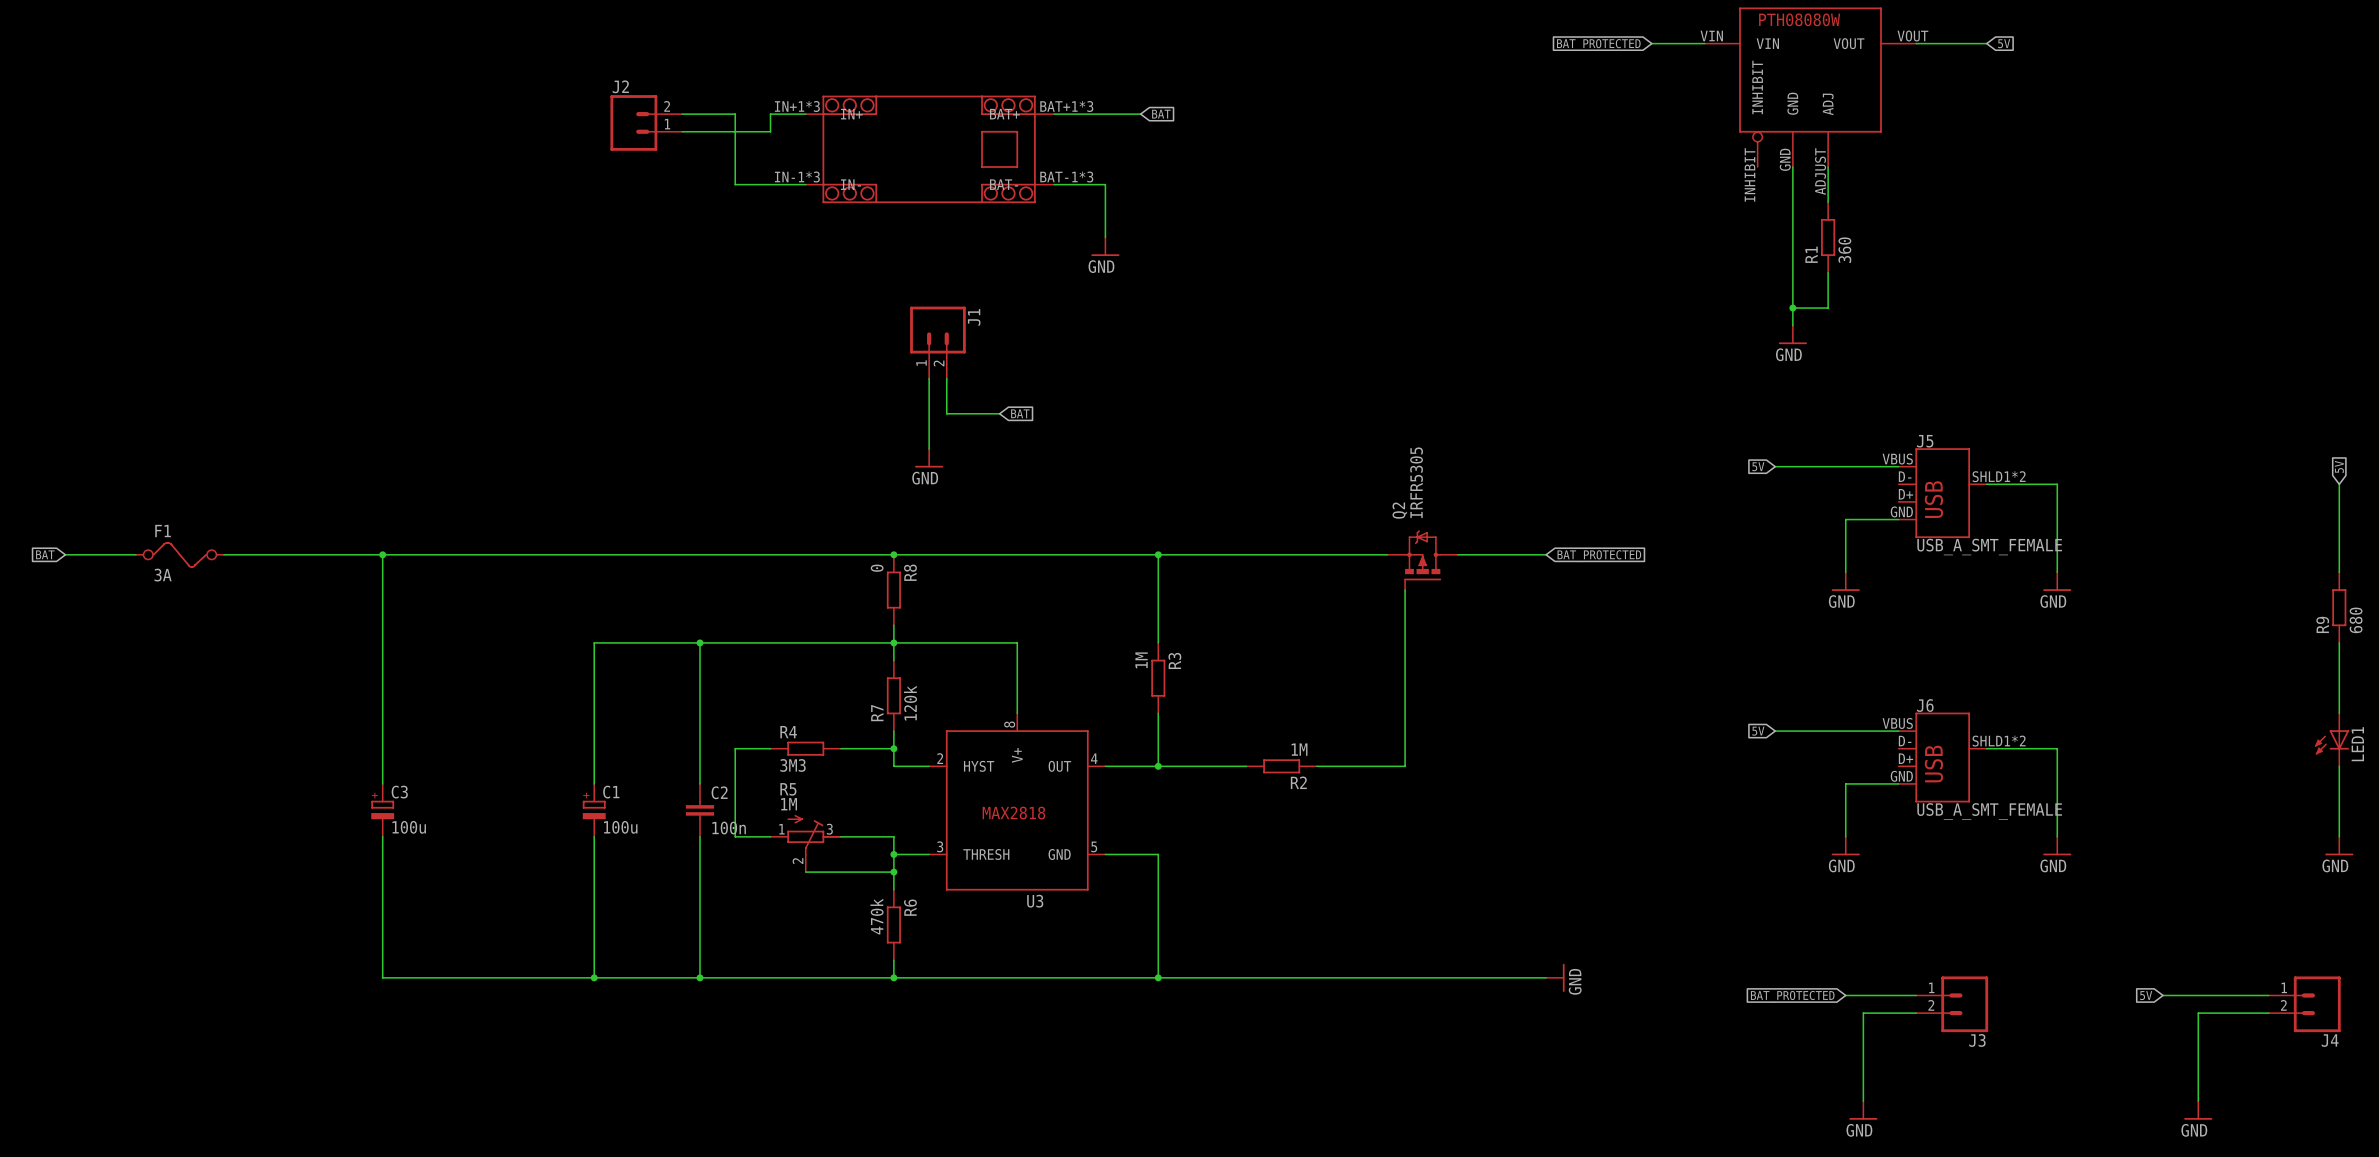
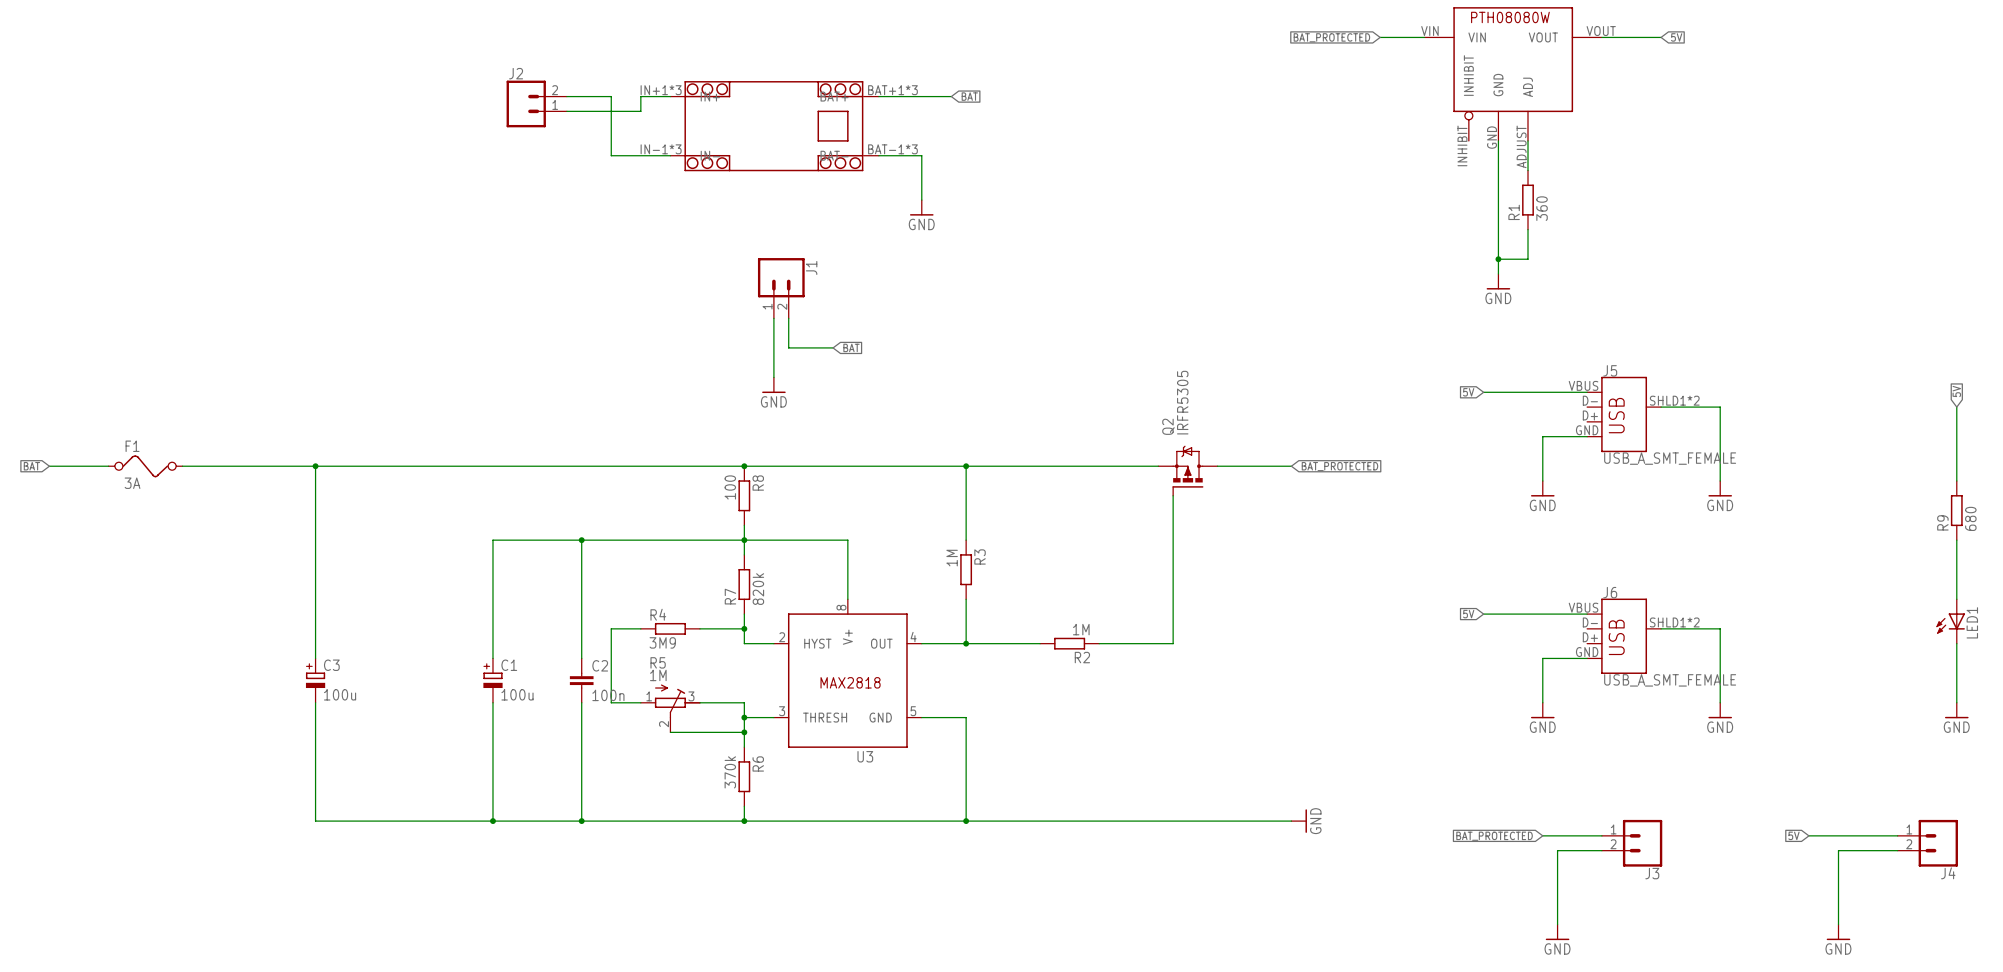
R8 value: 0 (877, 568) -> 100 (730, 487)
R7 value: 120k (910, 703) -> 820k (758, 589)
R4 value: 3M3 (793, 765) -> 3M9 (662, 642)
R6 value: 470k (877, 916) -> 370k (730, 772)

